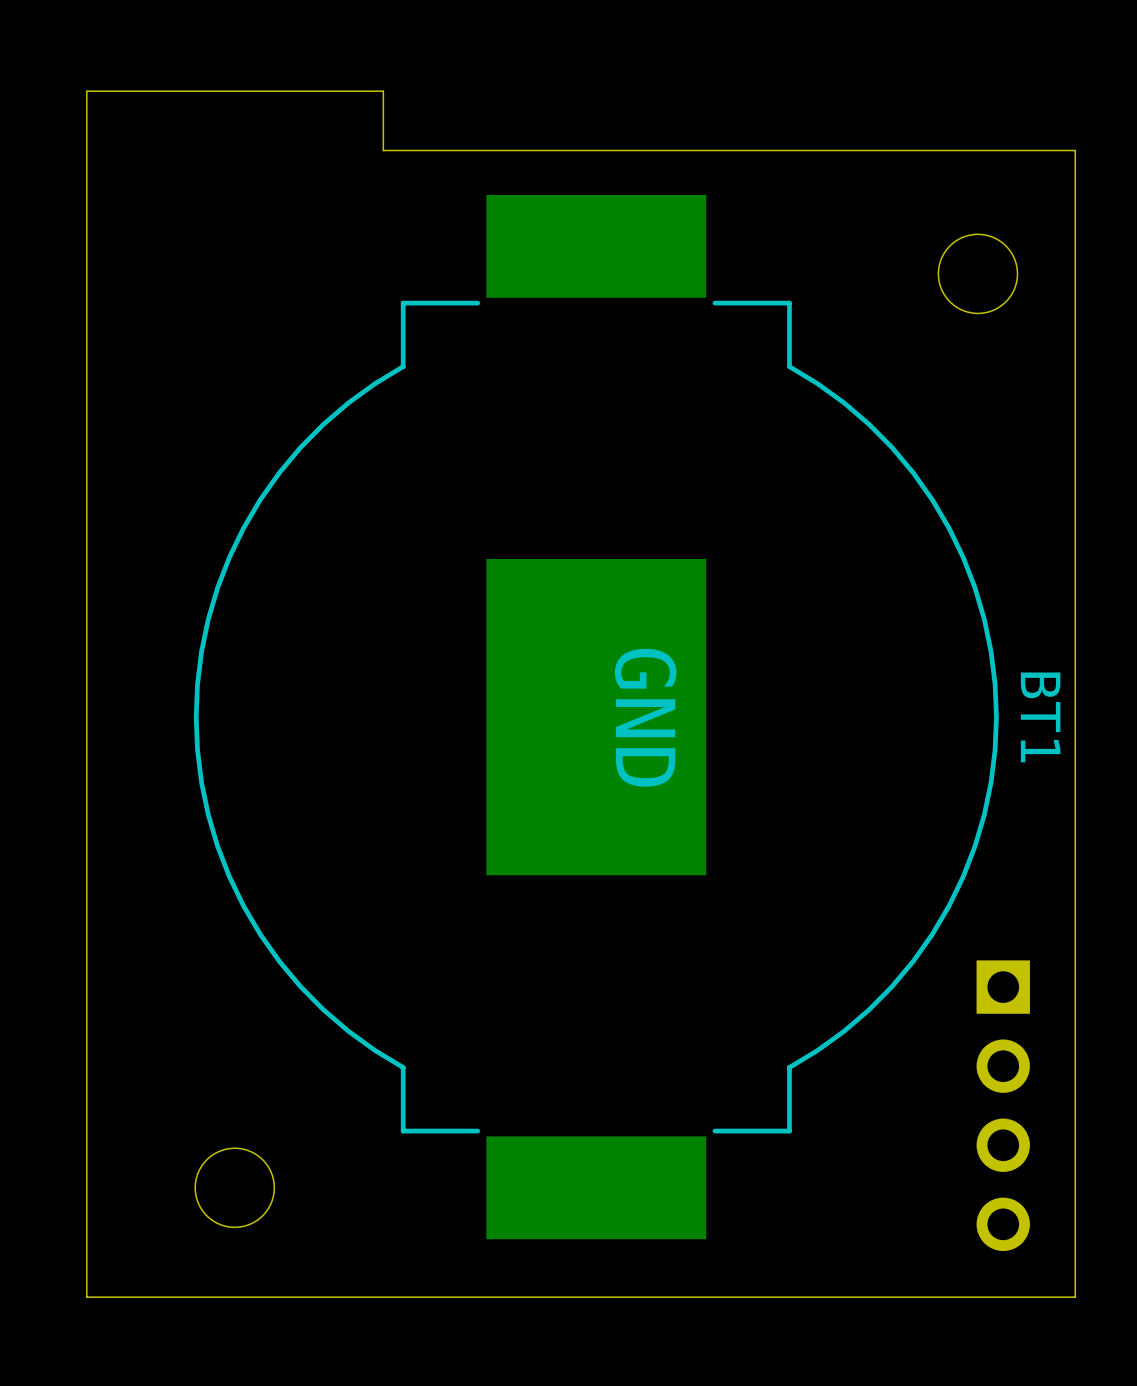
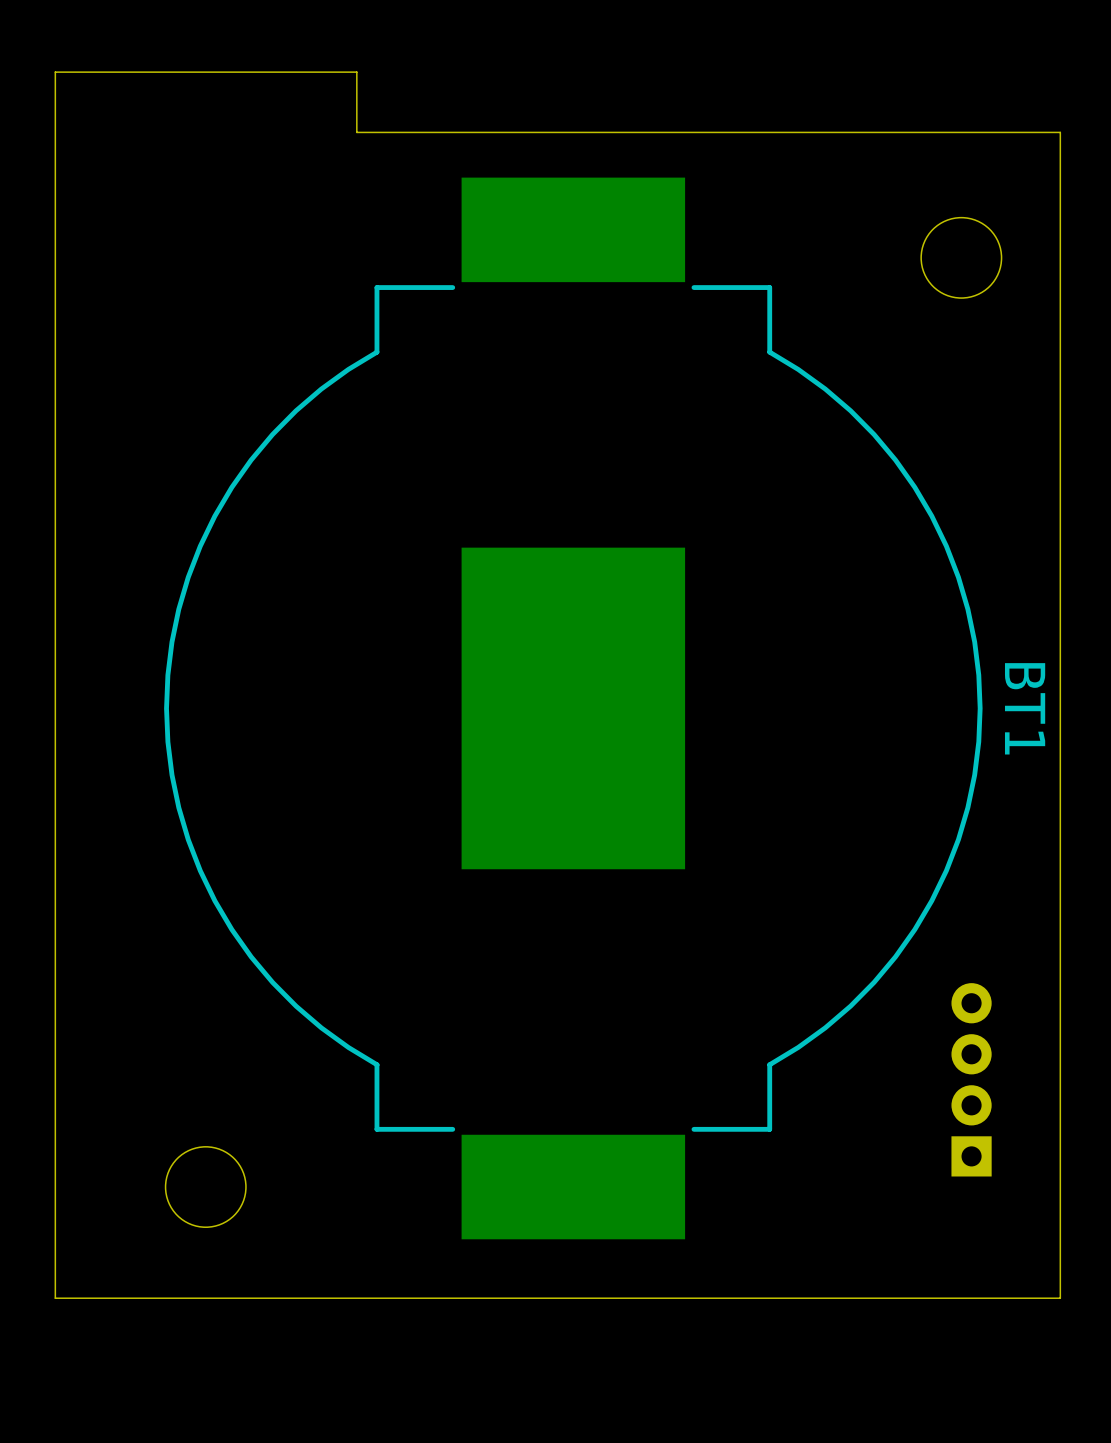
text: GND (645, 717) -> none
part footprint: [976, 960, 1030, 1252] -> [951, 983, 992, 1177]

